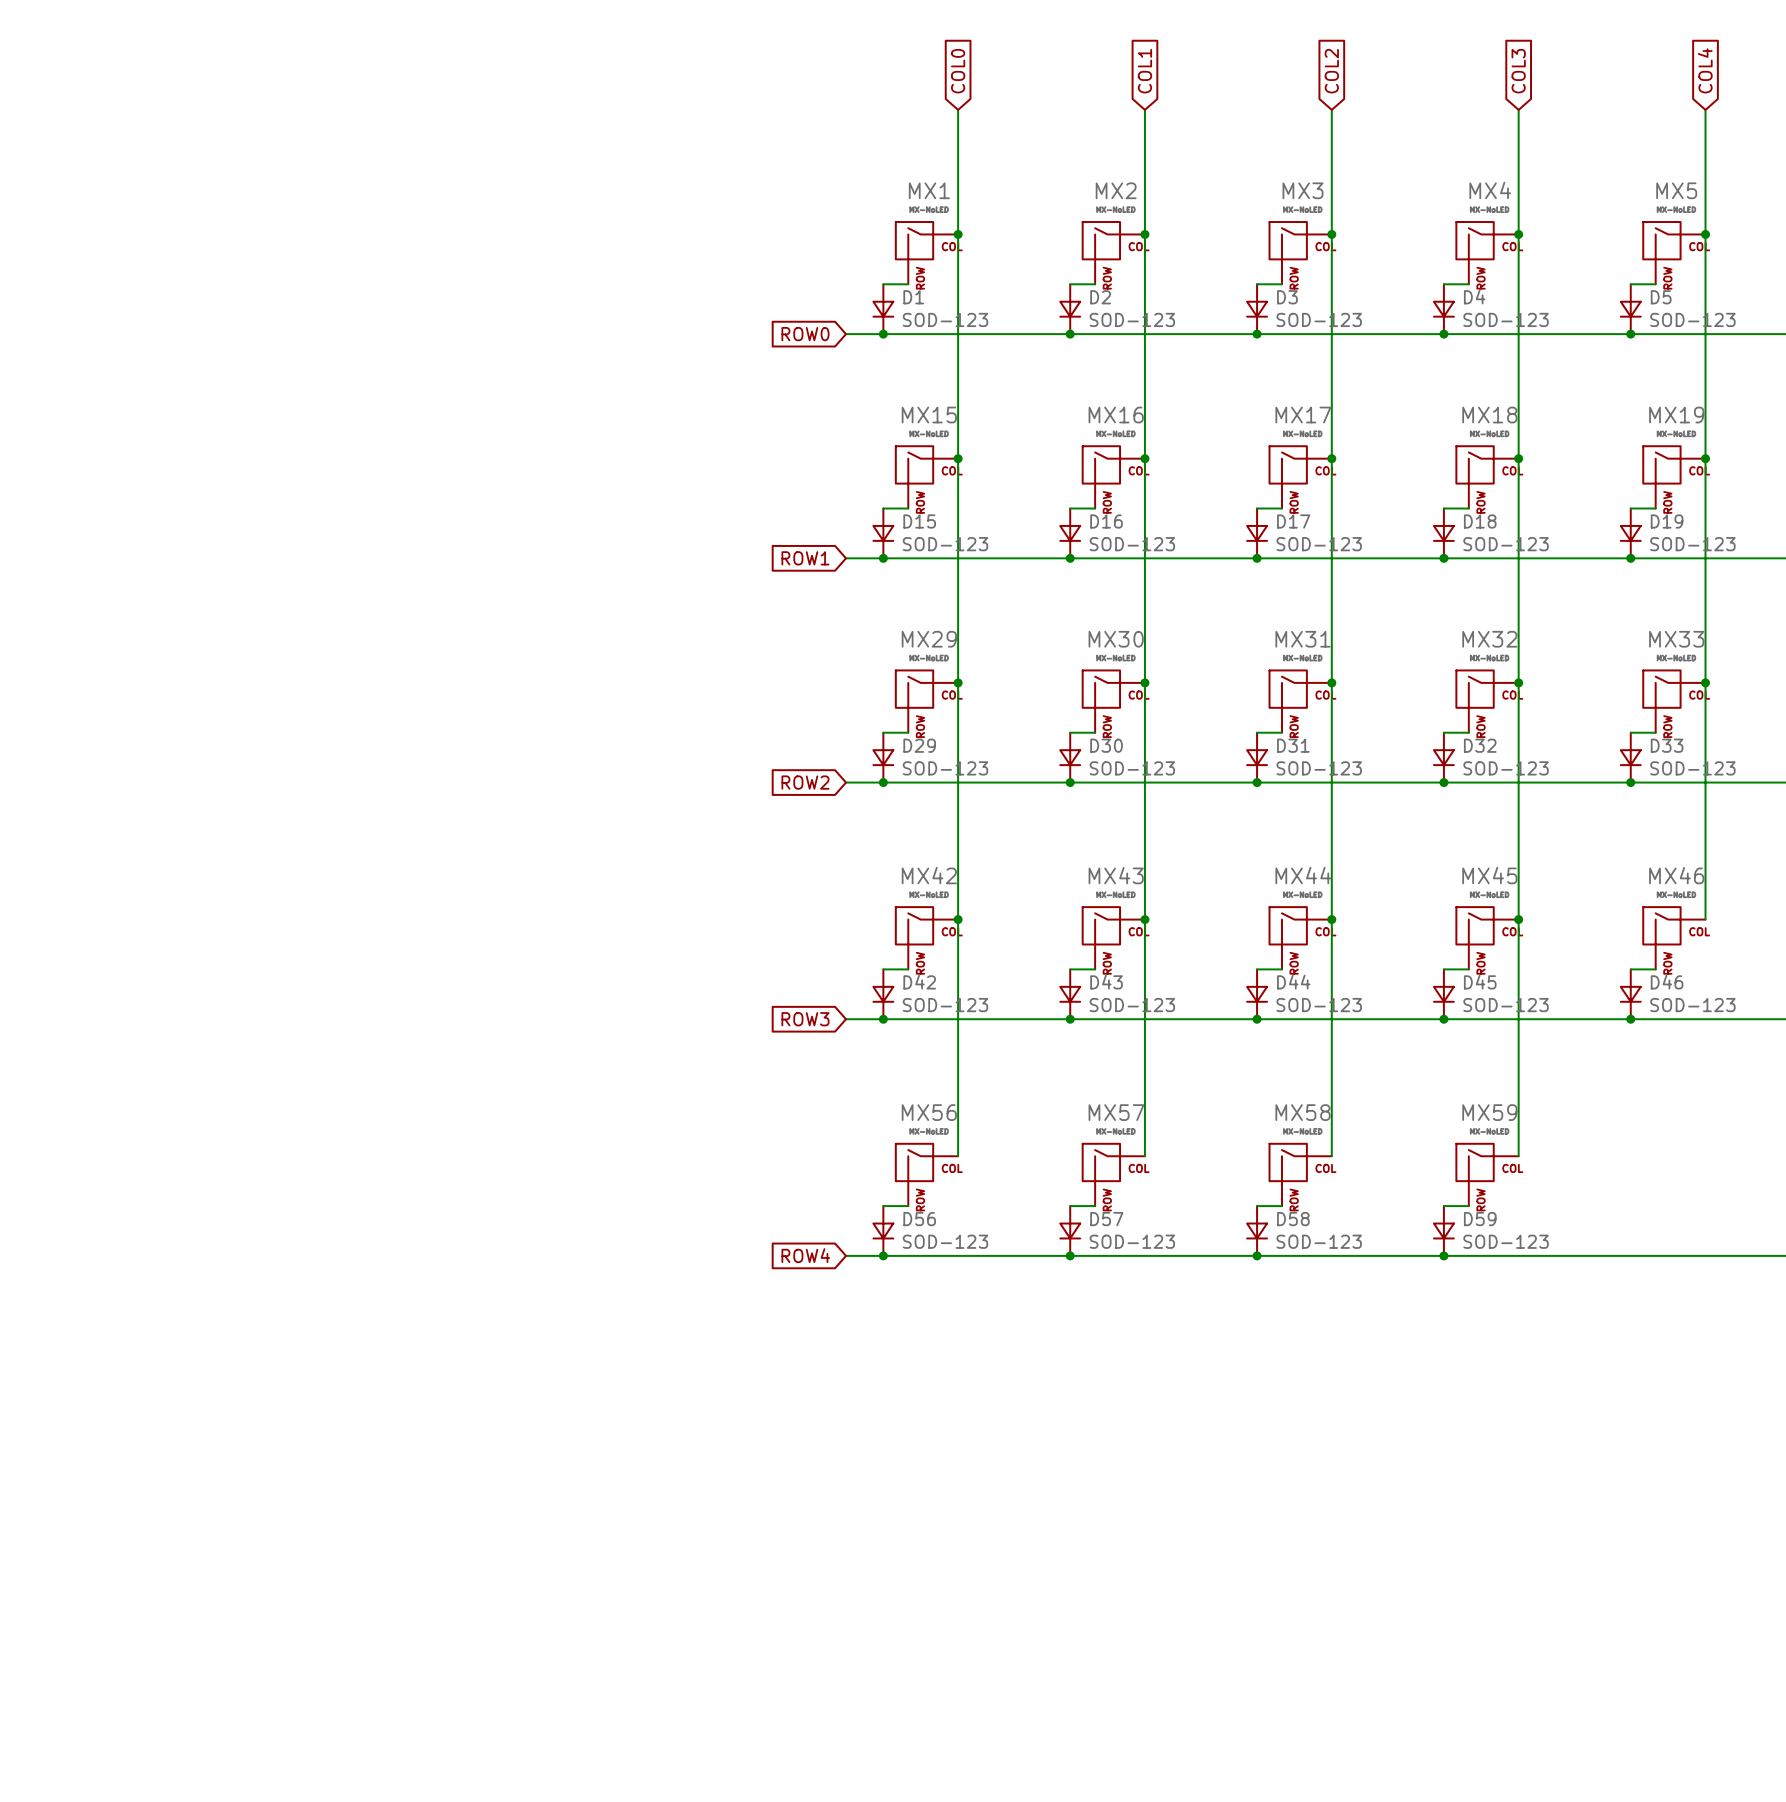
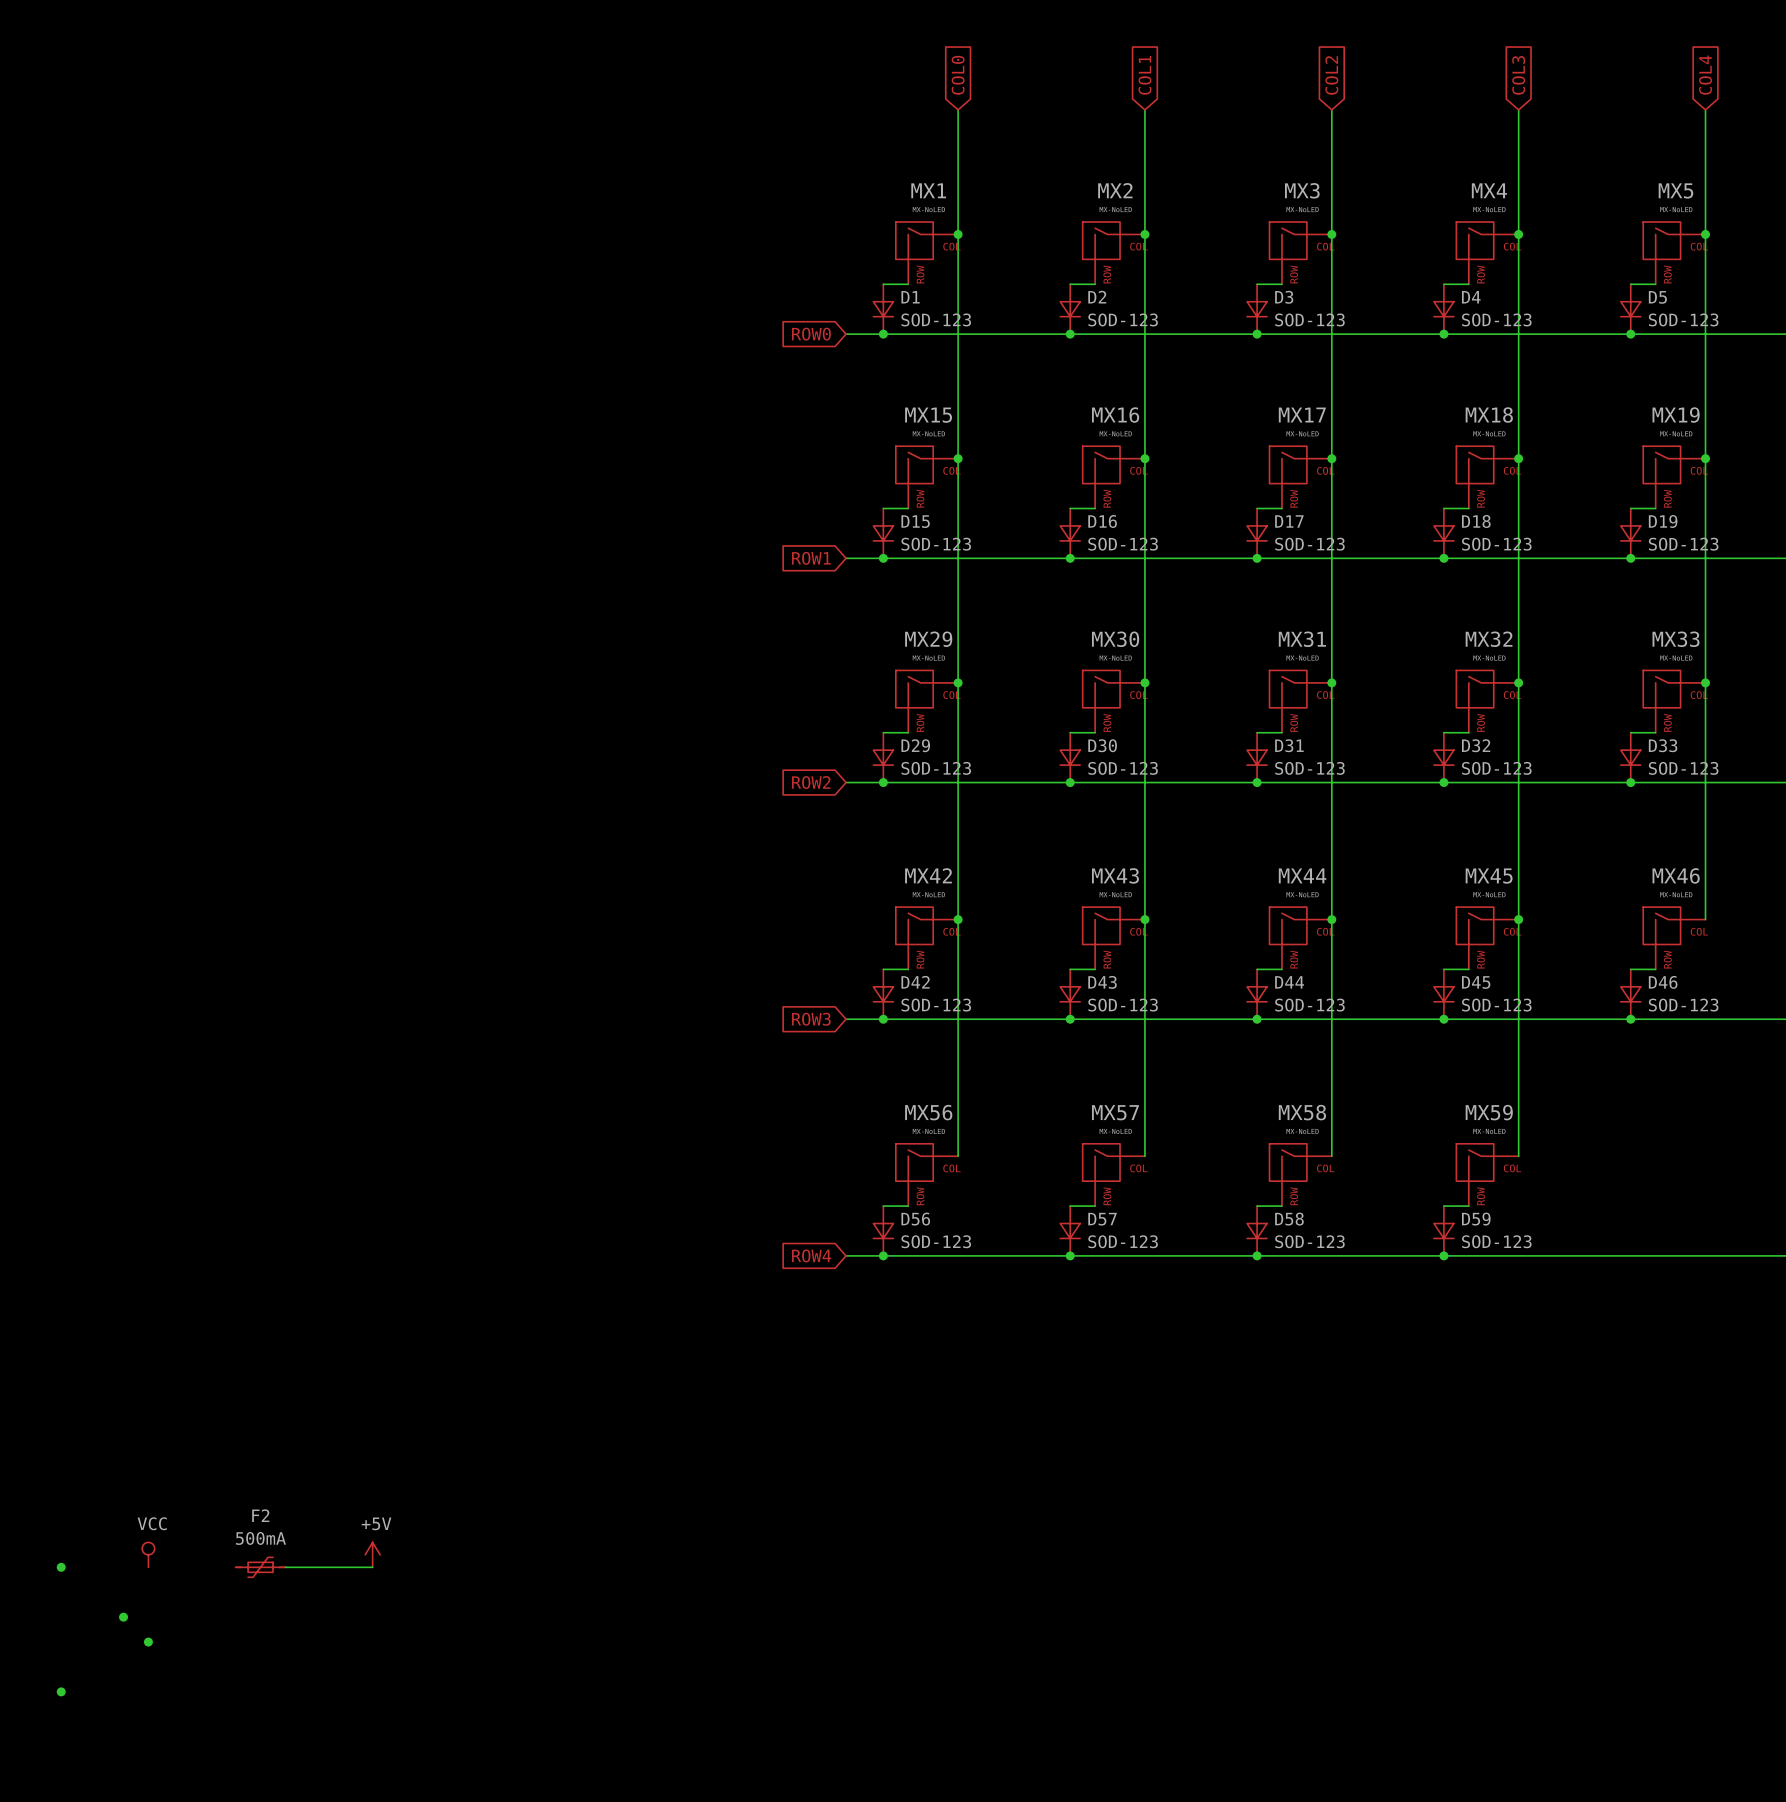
power symbol: none -> VCC (148, 1554)
power symbol: none -> +5V (372, 1554)
junction: none -> (61, 1567)
F2: none -> 500mA (260, 1567)
wire: none -> (285, 1567) (372, 1567)
junction: none -> (123, 1617)
junction: none -> (148, 1642)
junction: none -> (61, 1691)

